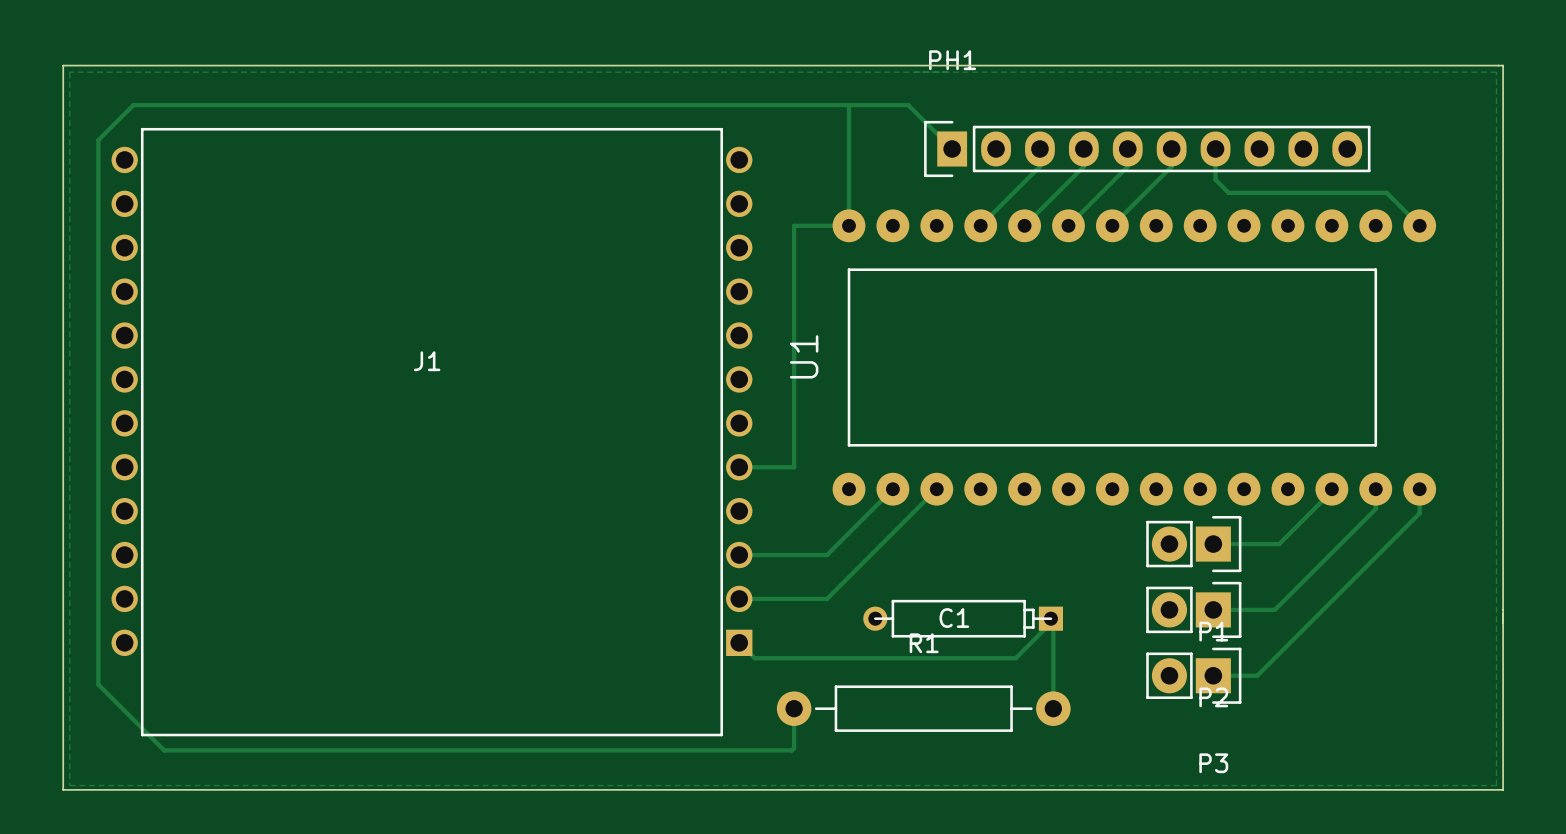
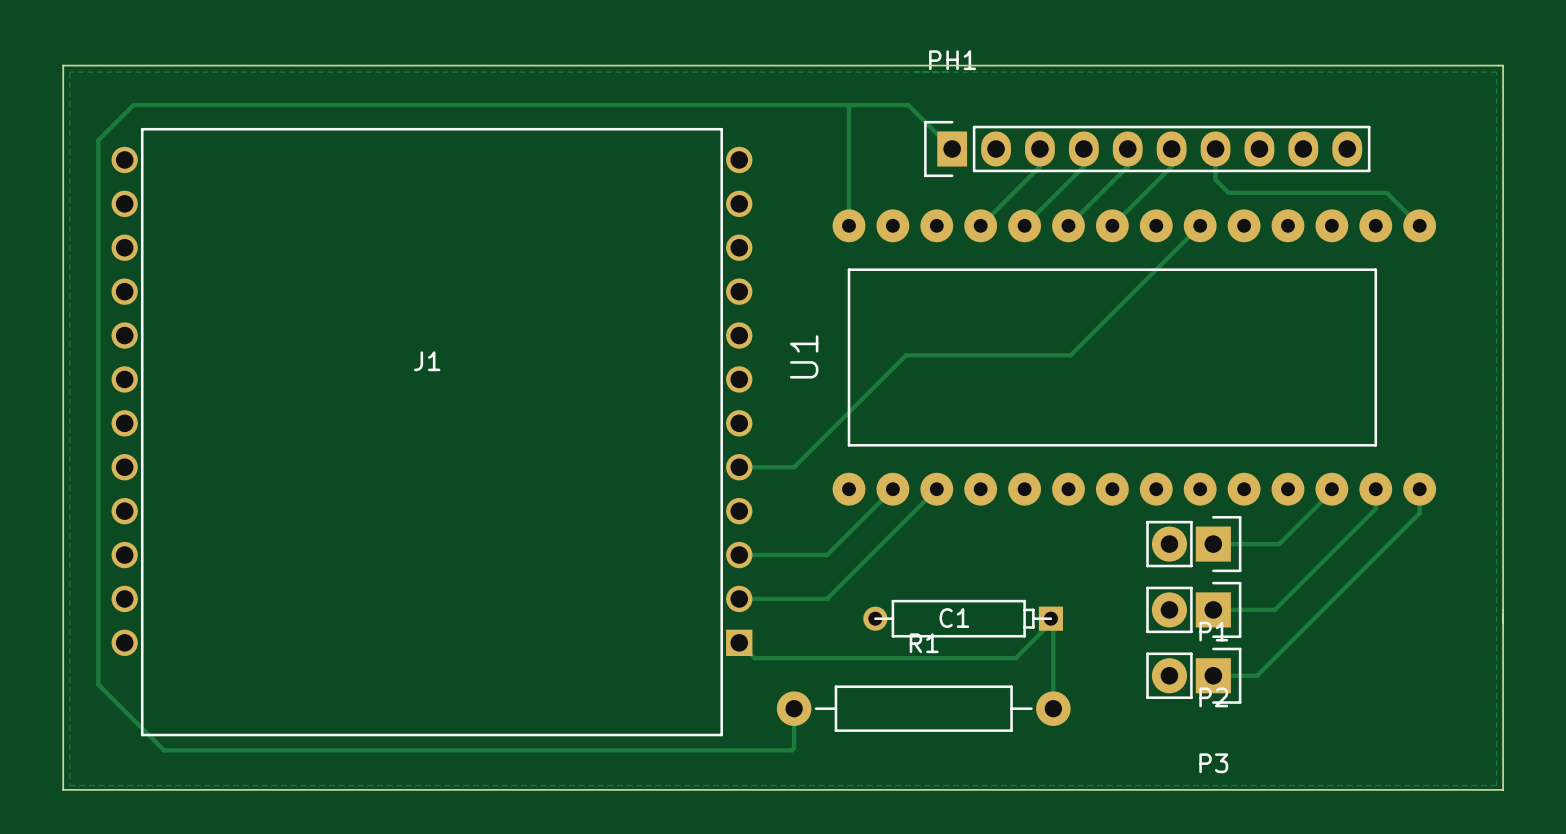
track: (849, 225) (794, 225) (794, 467) -> (1200, 225) (1070, 355) (906, 355) (794, 467)

